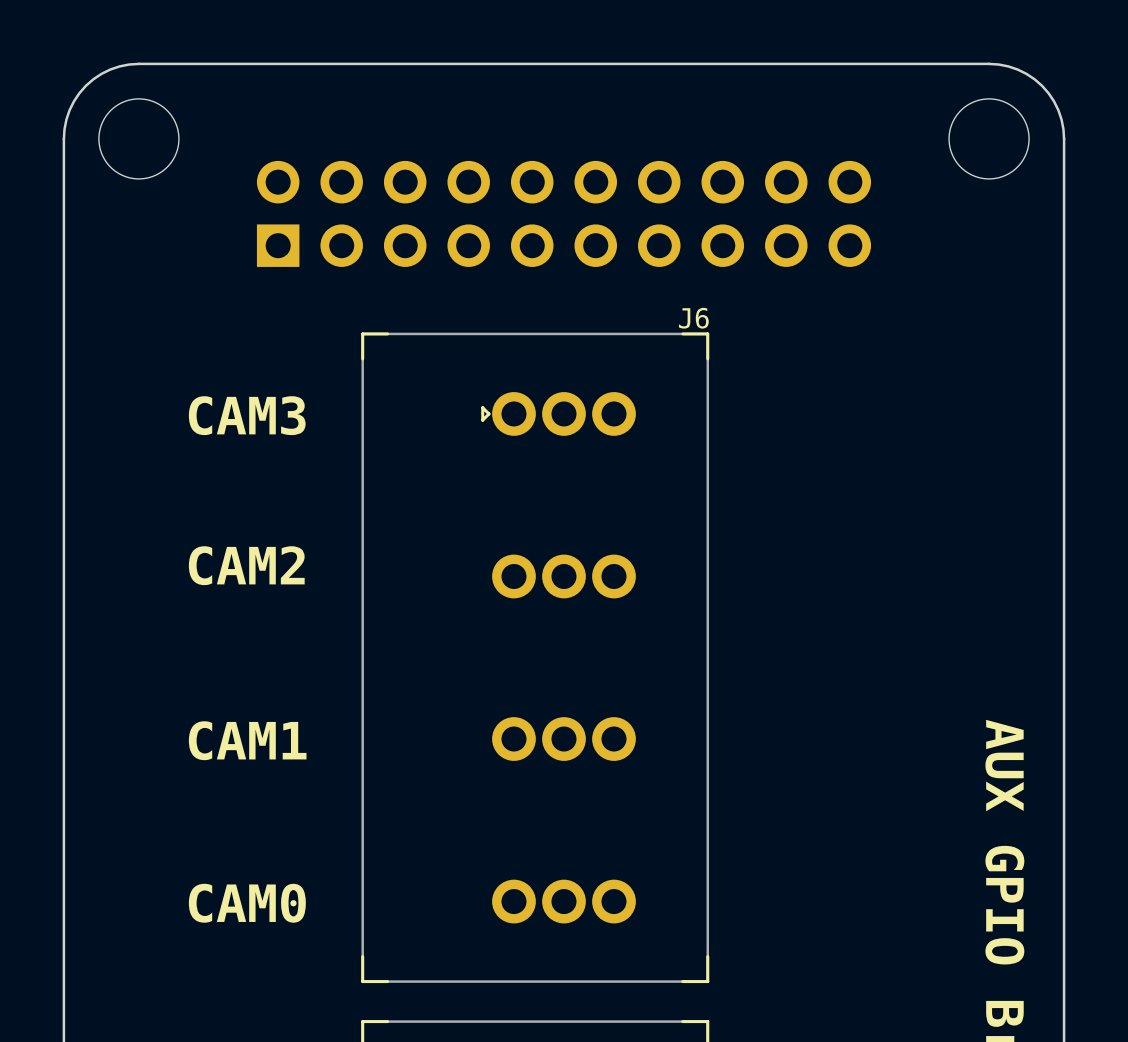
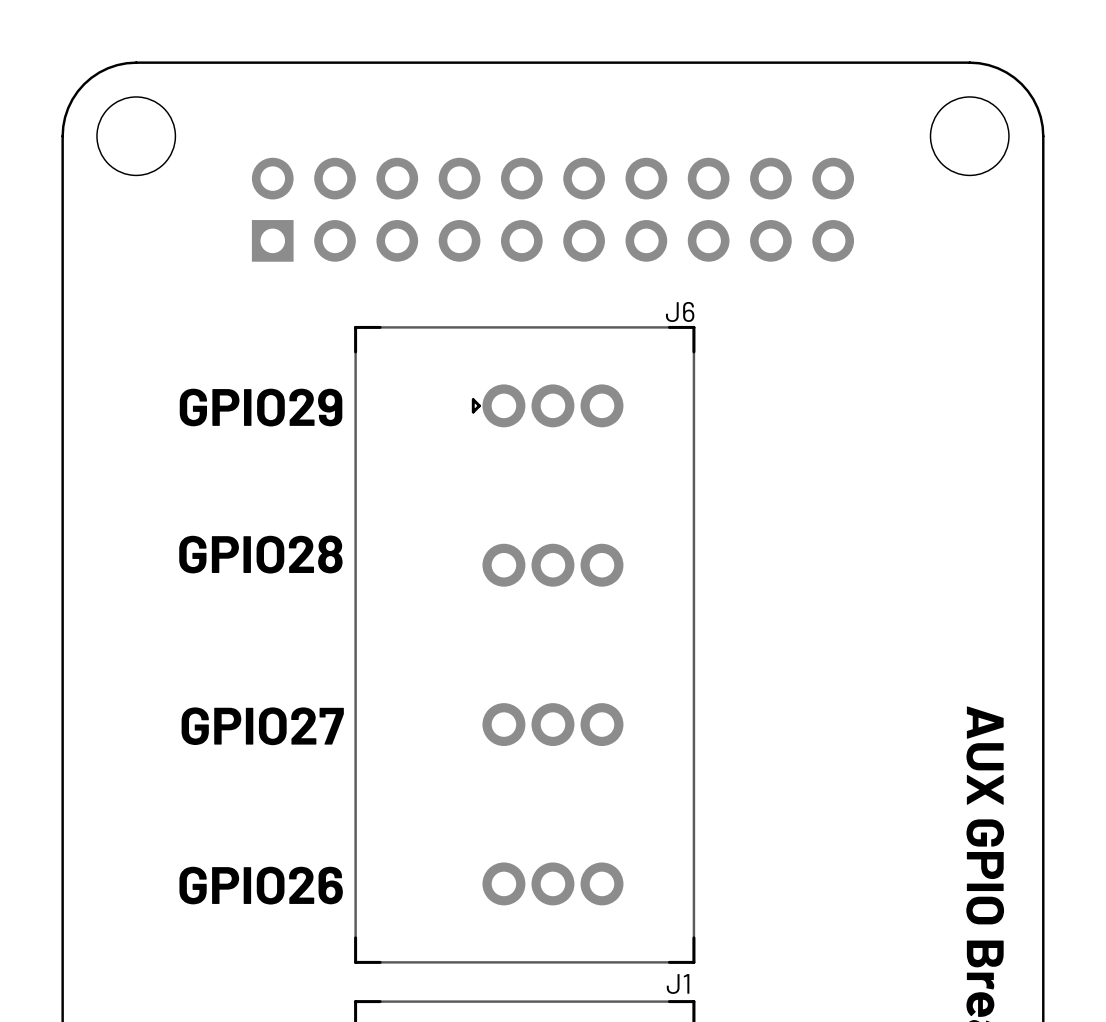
text: CAM3 (247, 415) -> none
text: none -> GPIO29 (261, 407)
text: CAM2 (246, 565) -> none
text: none -> GPIO28 (260, 554)
text: CAM1 (247, 740) -> none
text: none -> GPIO27 (262, 726)
text: CAM0 (247, 903) -> none
text: none -> GPIO26 (261, 885)
J1 name: none -> J1 (678, 984)

